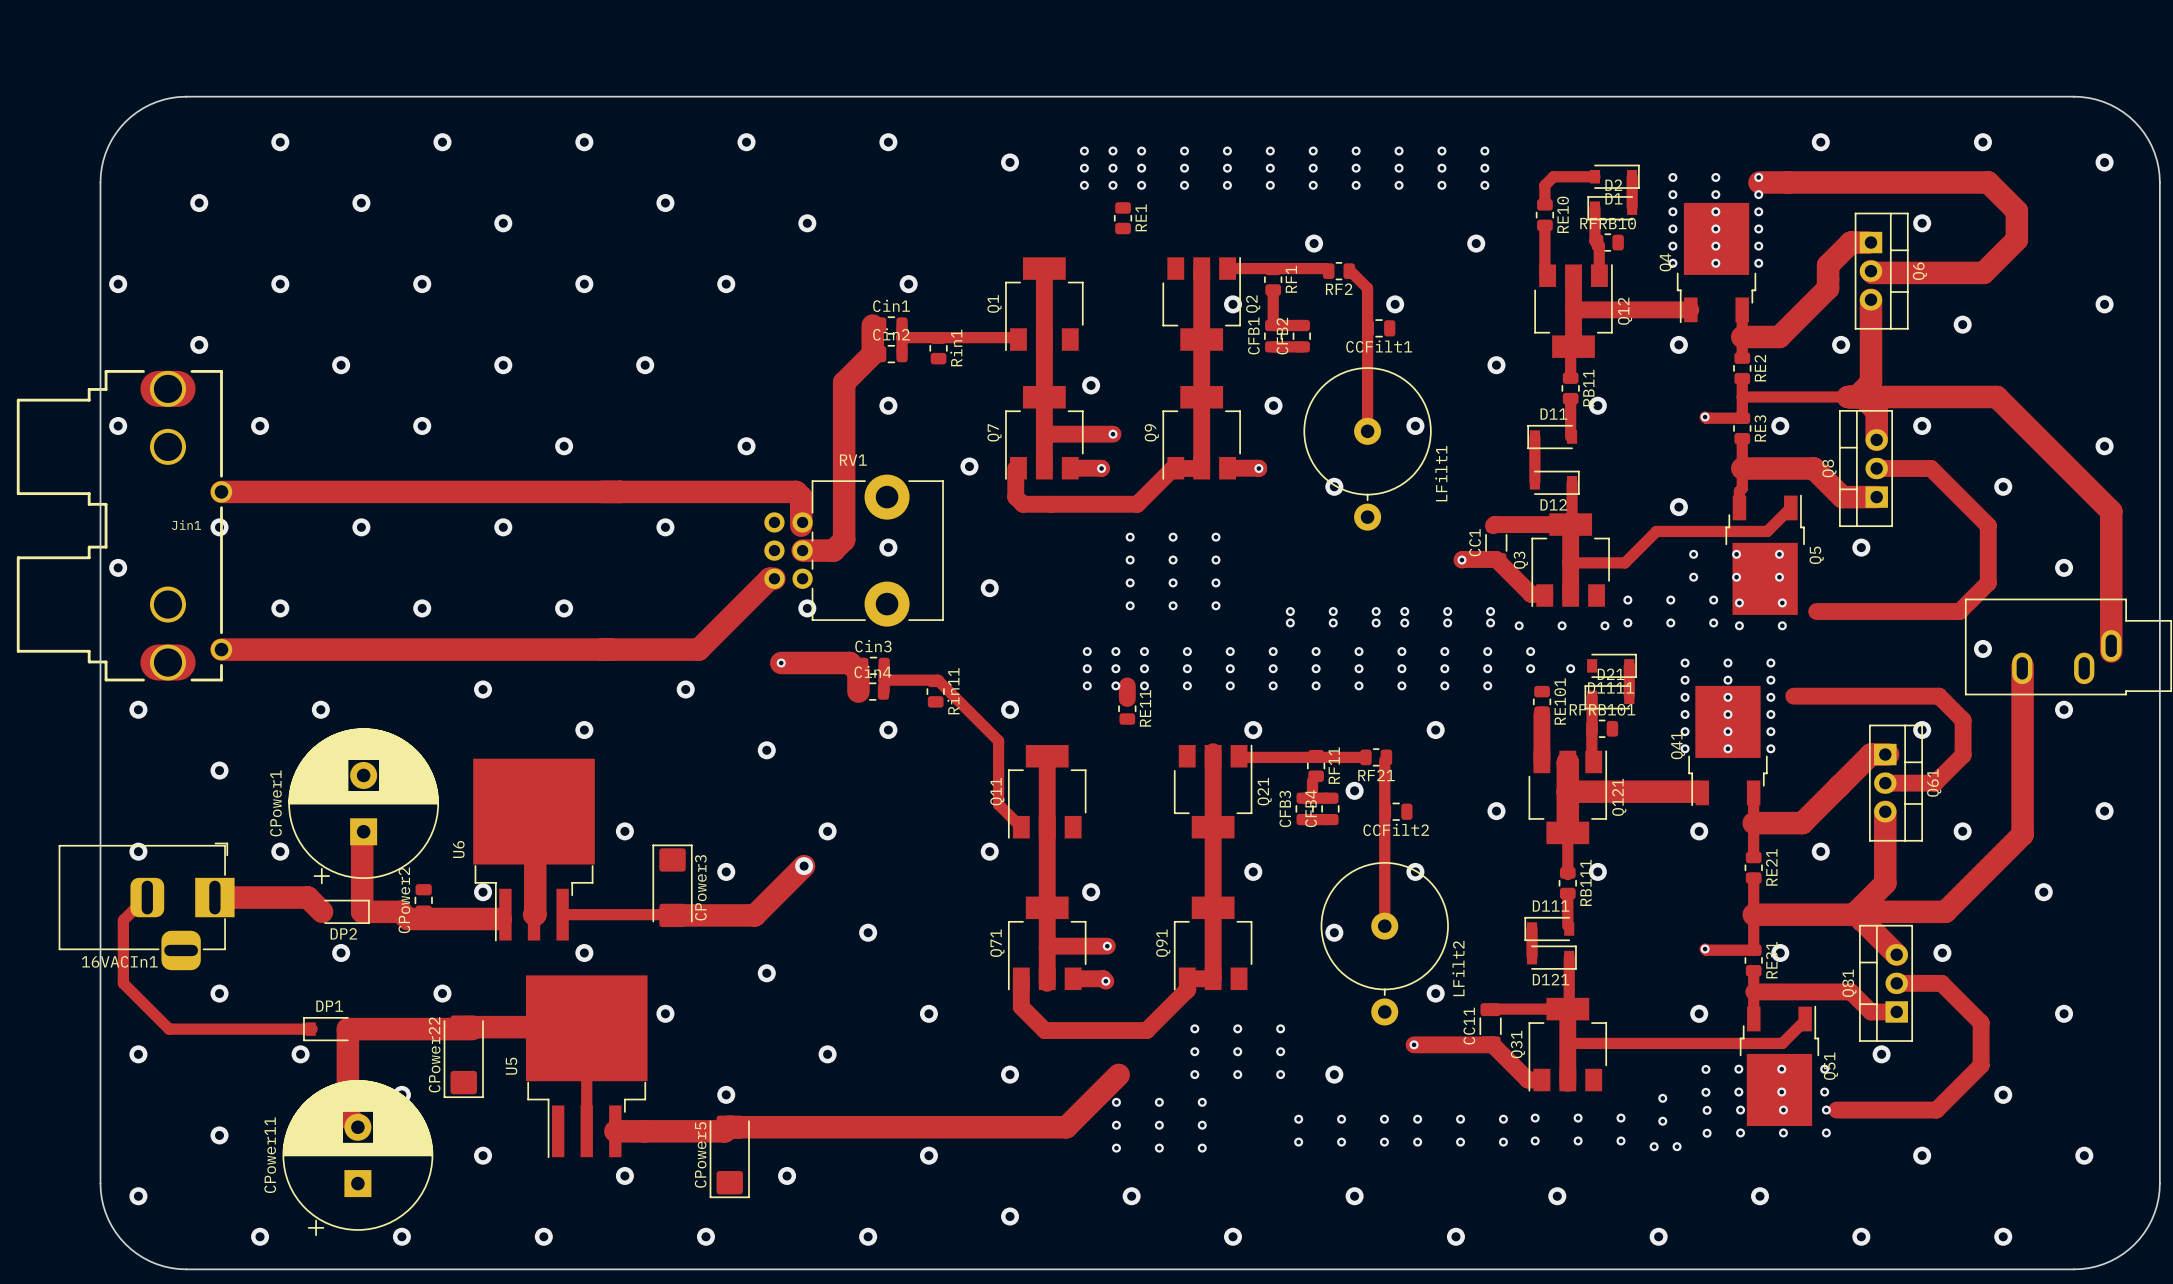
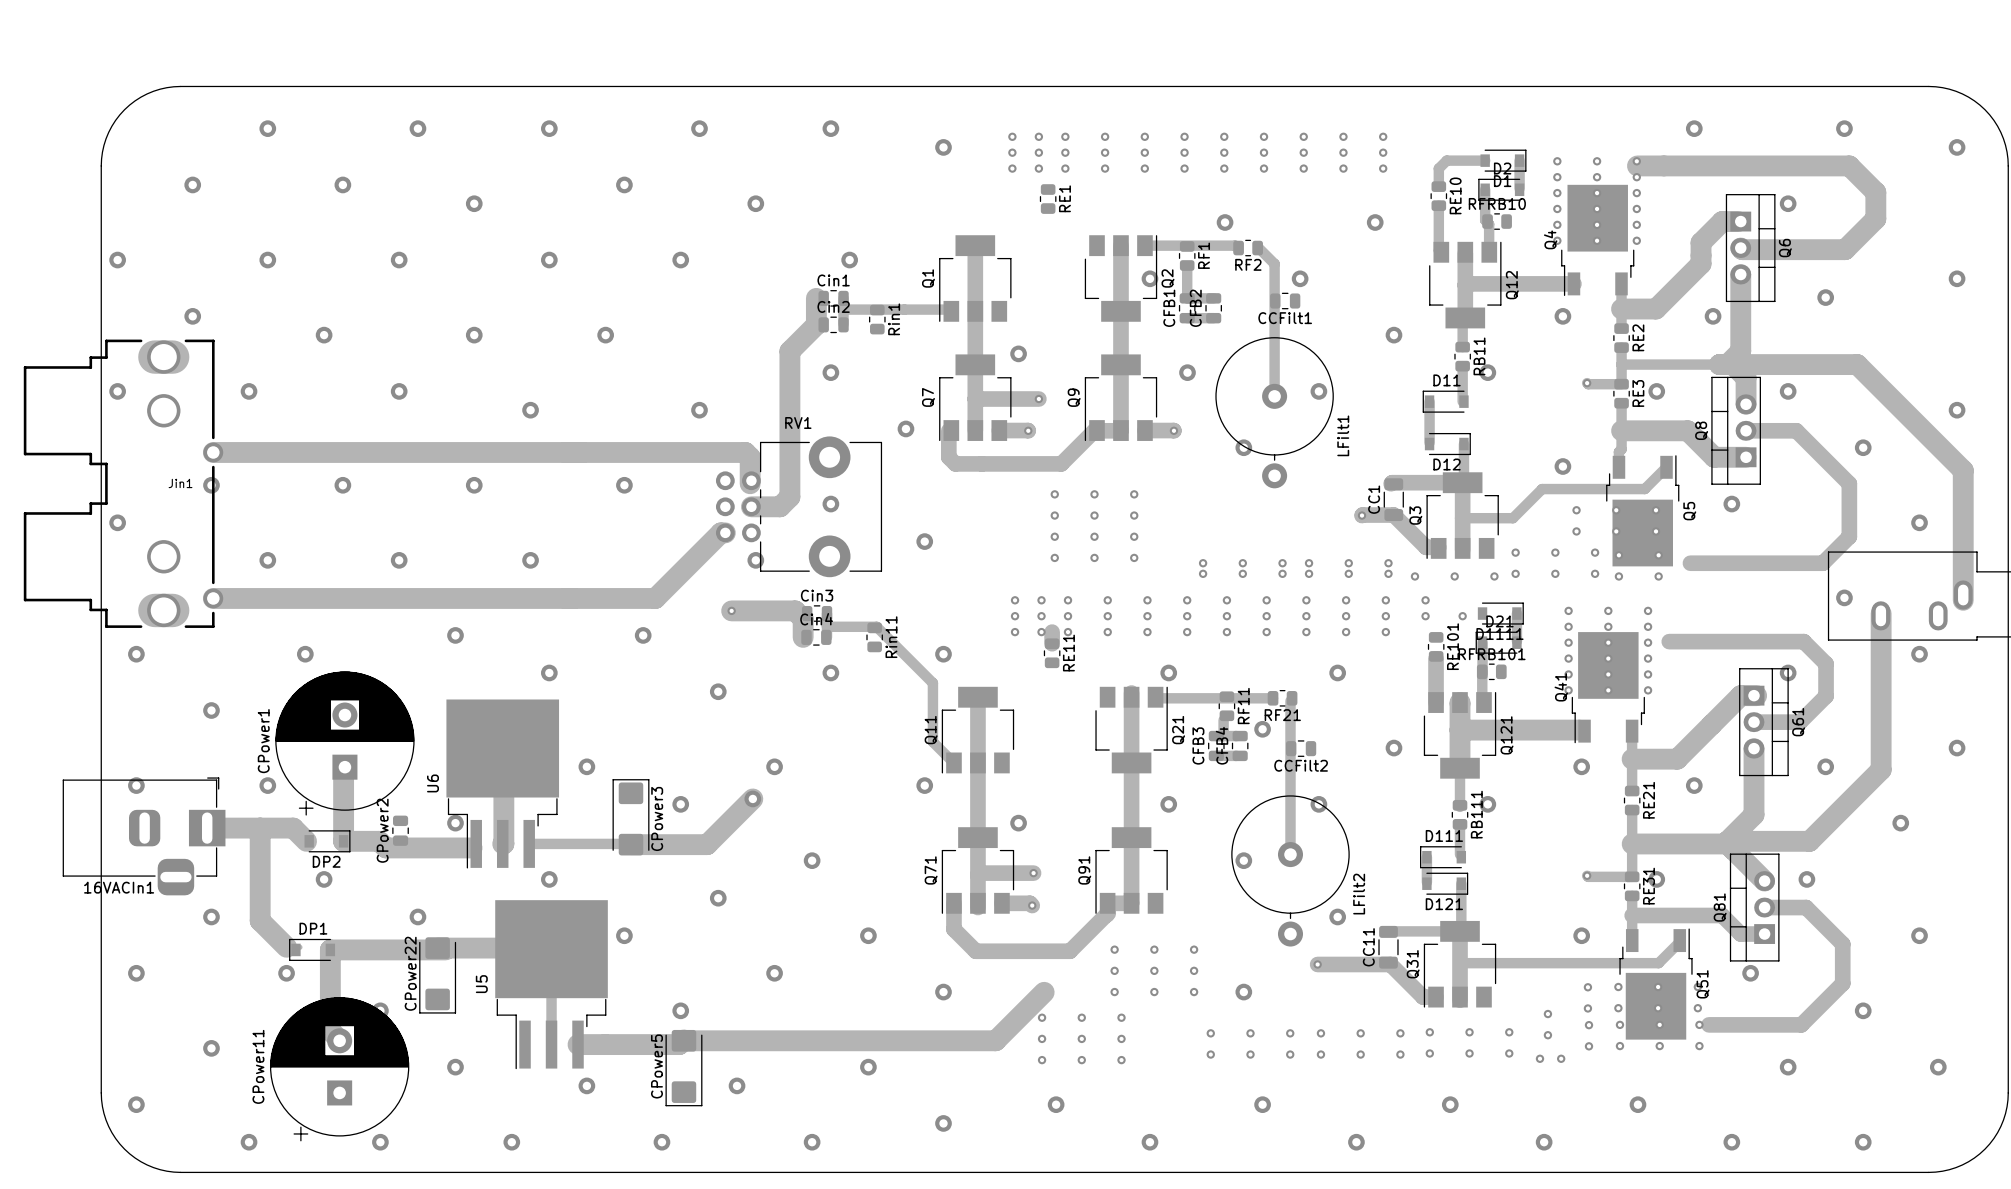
track: (147, 897) (123, 920) (123, 983) (169, 1029) (312, 1029) -> none
track: none -> (260, 828) (260, 920) (286, 947) (299, 947)

